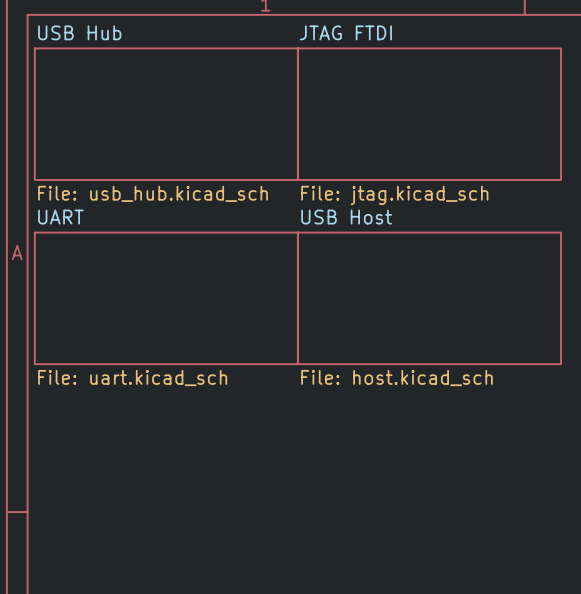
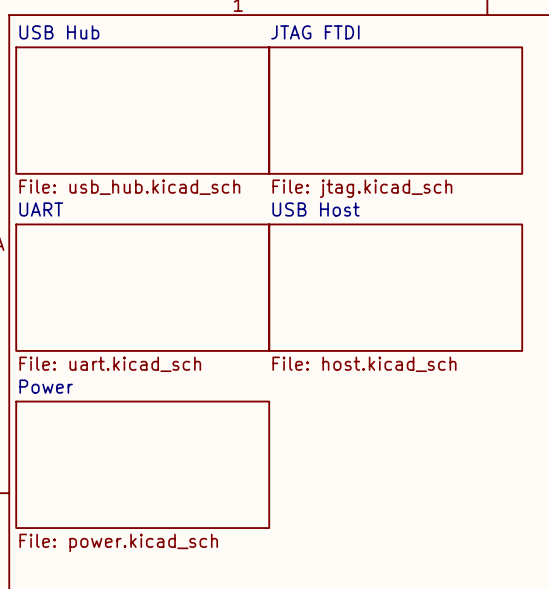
sheet Power: none -> File: power.kicad_sch (142, 464)

